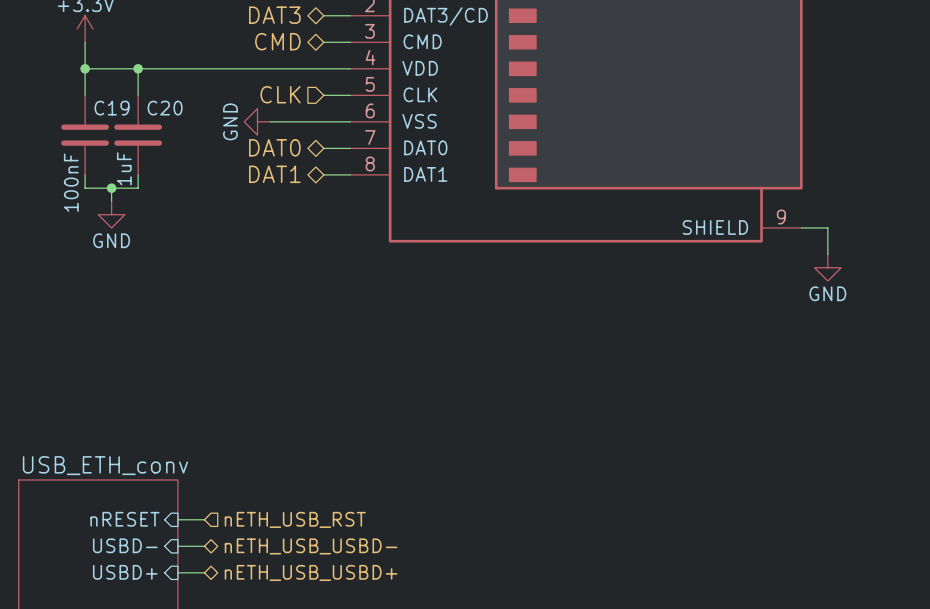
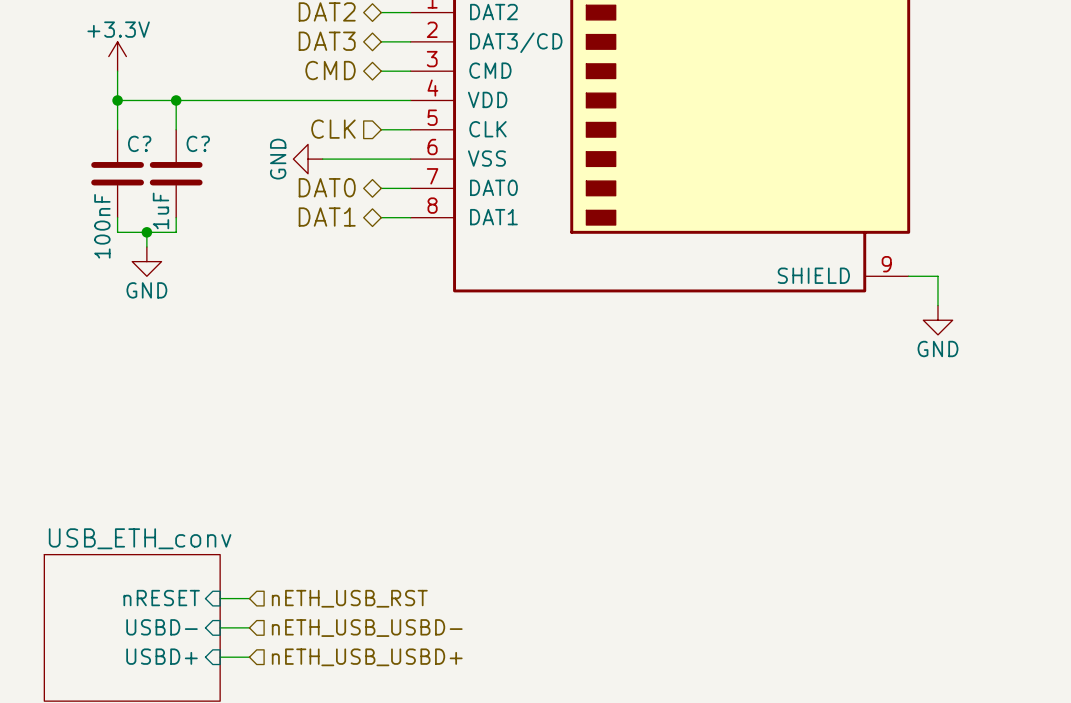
C19 name: C19 (112, 108) -> C? (139, 143)
C20 name: C20 (165, 108) -> C? (198, 143)
hierarchical label shape: bidirectional (311, 546) -> input (367, 628)
hierarchical label shape: bidirectional (311, 572) -> input (367, 657)

